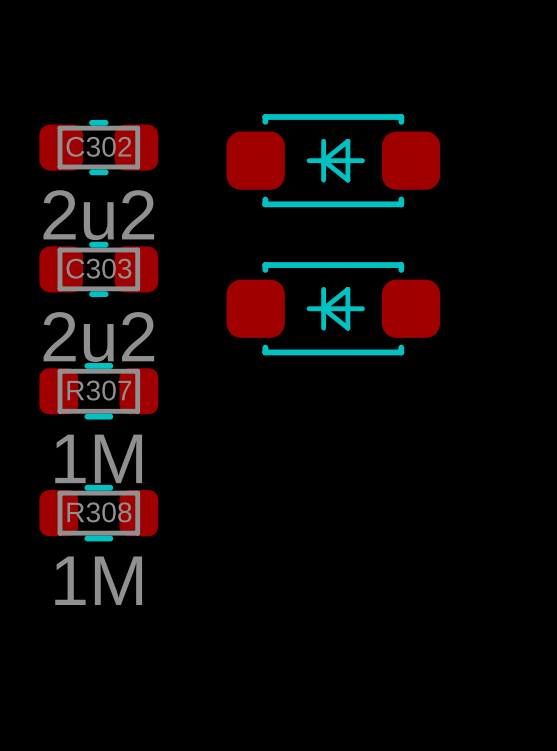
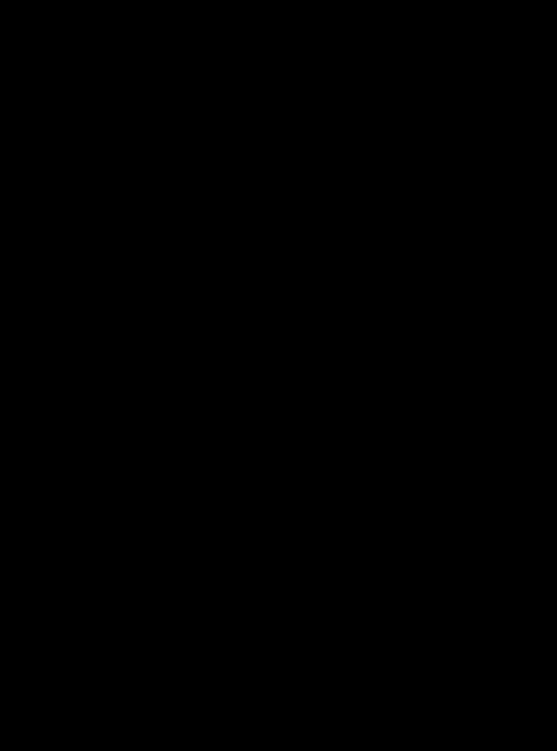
C302: 2u2 (98, 147) -> none
part: (333, 160) -> none
C303: 2u2 (98, 269) -> none
part: (333, 308) -> none
R307: 1M (98, 391) -> none
R308: 1M (98, 513) -> none

